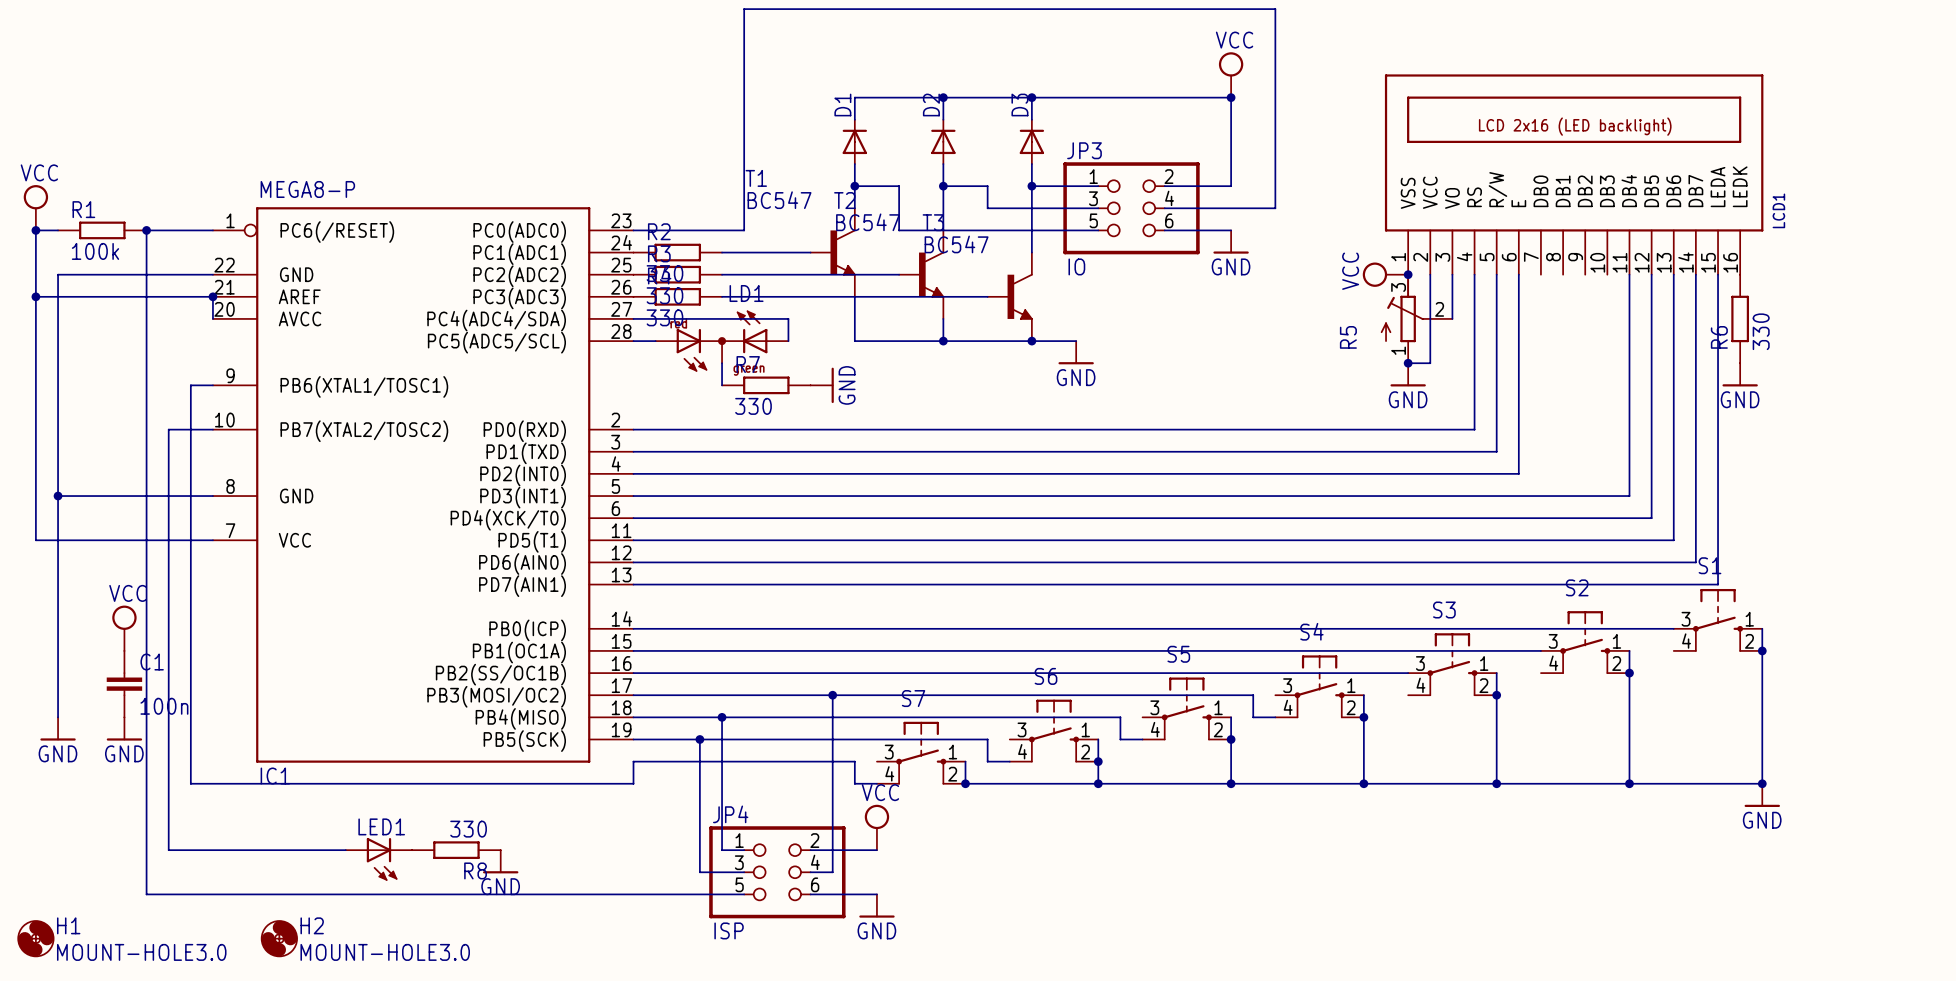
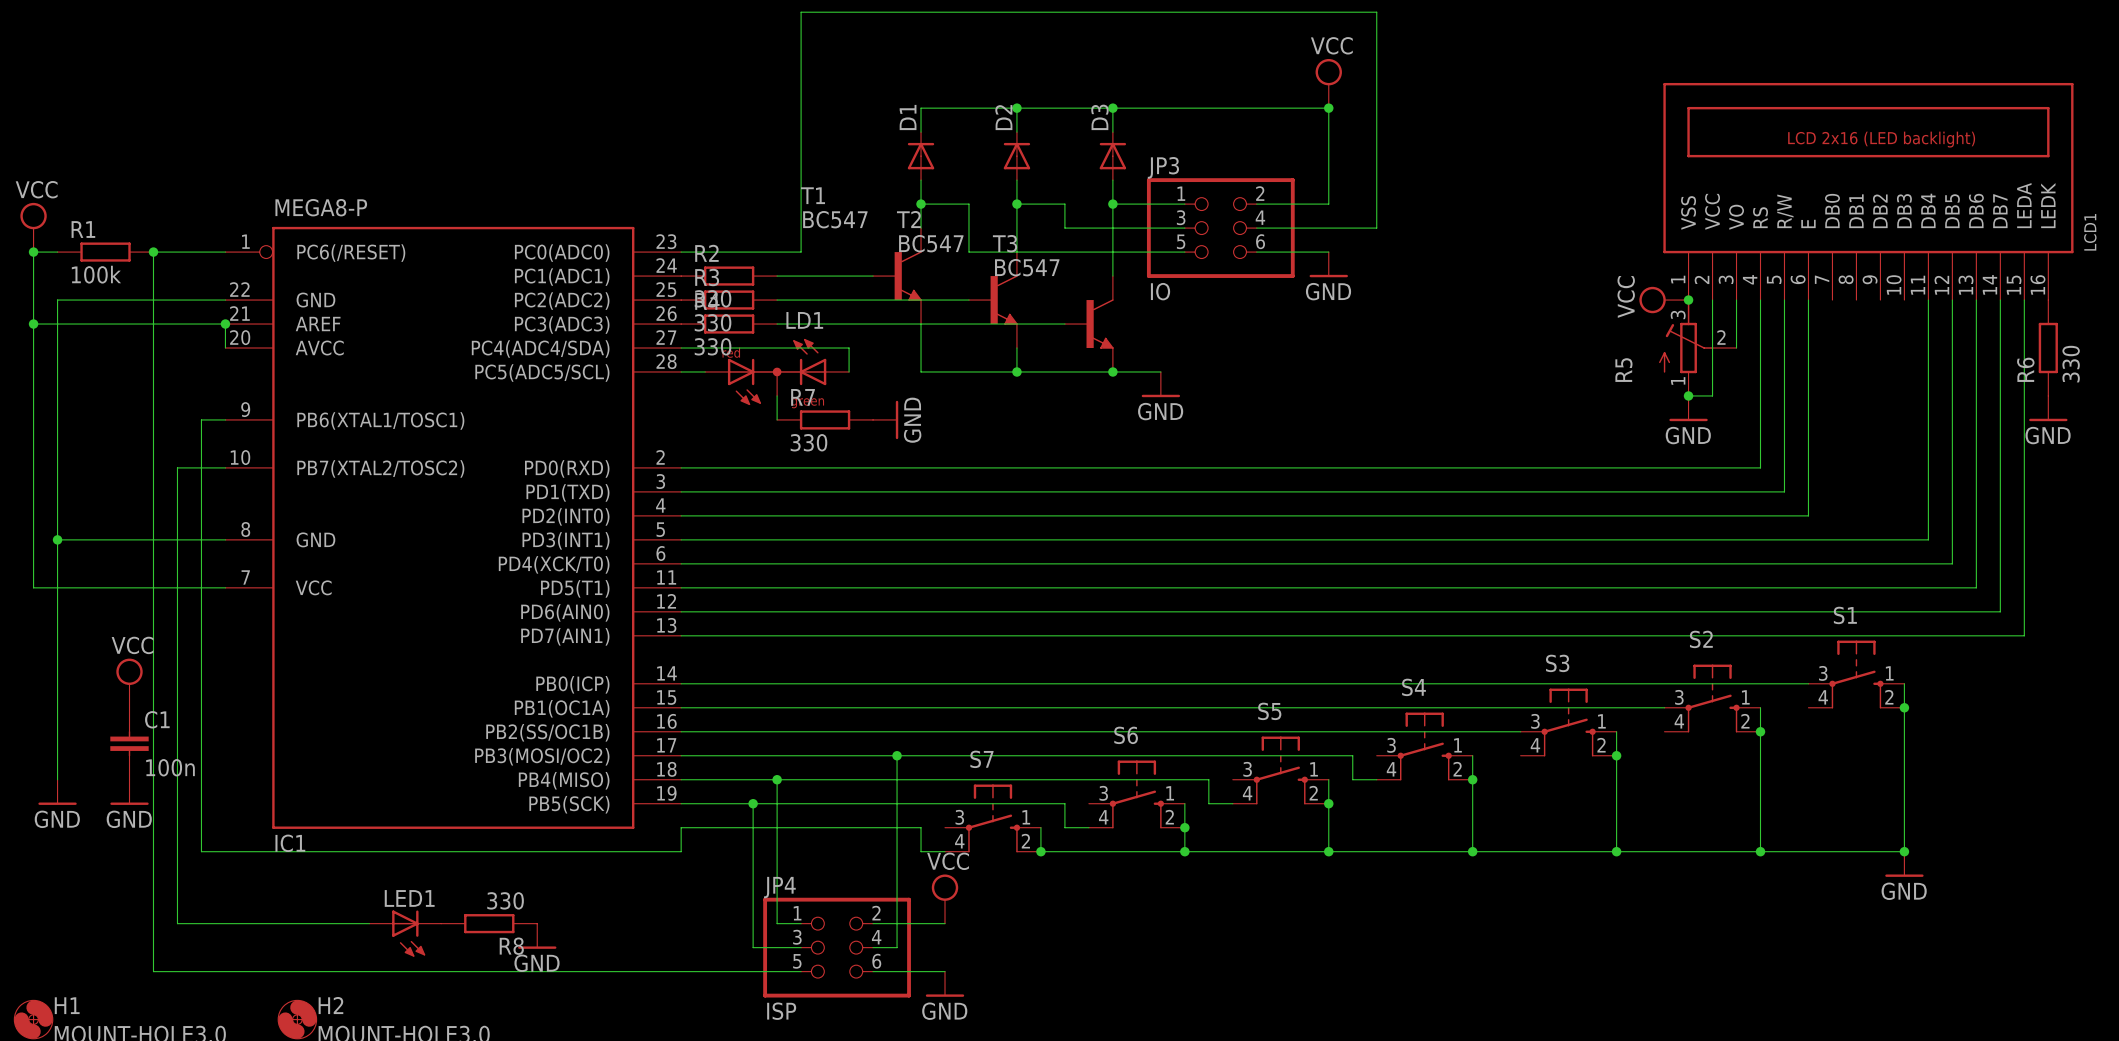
LCD1 position: (1574, 174) -> (1868, 191)
power symbol position: VCC (1385, 274) -> VCC (1663, 300)
junction: (1408, 274) -> none
wire: (1430, 274) (1430, 363) (1408, 363) -> (1712, 300) (1712, 395) (1688, 395)
wire: (1452, 274) (1452, 318) -> (1736, 300) (1736, 348)
wire: (1474, 274) (1474, 429) -> none
wire: (1496, 274) (1496, 451) -> none
wire: (1518, 274) (1518, 473) -> none
junction: none -> (1688, 300)
wire: (1695, 274) (1695, 562) -> (2000, 300) (2000, 611) (1832, 611)
wire: (1718, 274) (1718, 584) -> (2024, 300) (2024, 635) (1856, 635)
wire: none -> (1928, 300) (1928, 539) (1760, 539)
wire: none -> (1952, 300) (1952, 563) (1784, 563)
wire: none -> (1976, 300) (1976, 587) (1808, 587)
R5 position: (1416, 318) -> (1697, 347)
R6 position: (1740, 318) -> (2048, 348)
junction: (1408, 363) -> none
junction: none -> (1688, 395)
power symbol: GND (1408, 374) -> none
power symbol: none -> GND (1688, 408)
power symbol: GND (1740, 374) -> none
power symbol: none -> GND (2048, 408)
wire: (1629, 429) (1629, 496) -> (1760, 467) (1592, 467)
wire: (1651, 451) (1651, 518) -> (1784, 491) (1616, 491)
wire: (1673, 473) (1673, 540) -> (1808, 515) (1640, 515)

